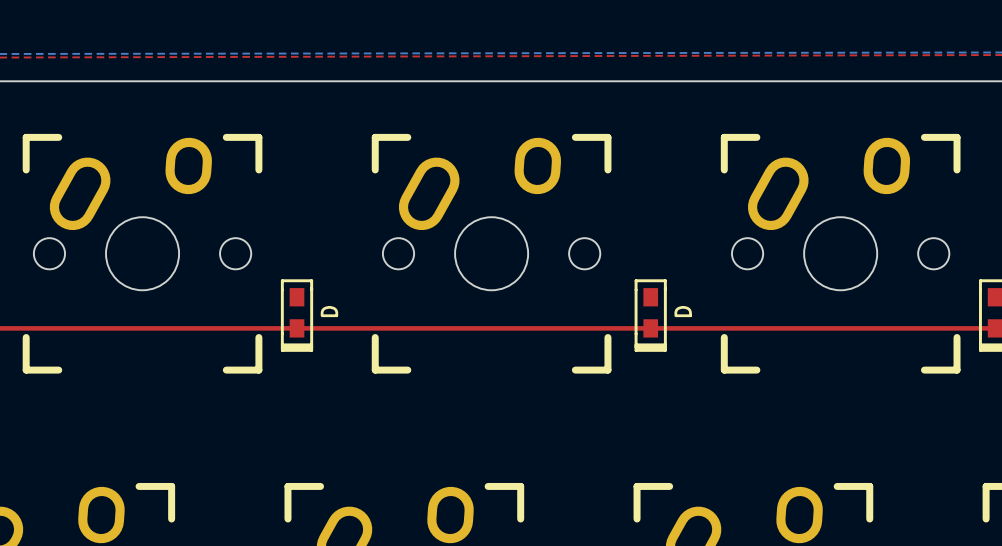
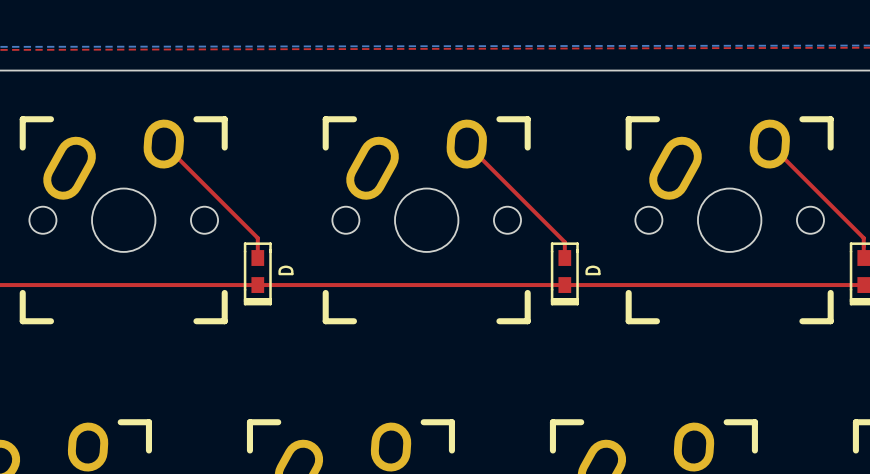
top track: none -> (163, 144) (257, 238) (257, 258)
top track: none -> (466, 144) (564, 242) (564, 258)
top track: none -> (769, 144) (863, 238) (863, 258)

